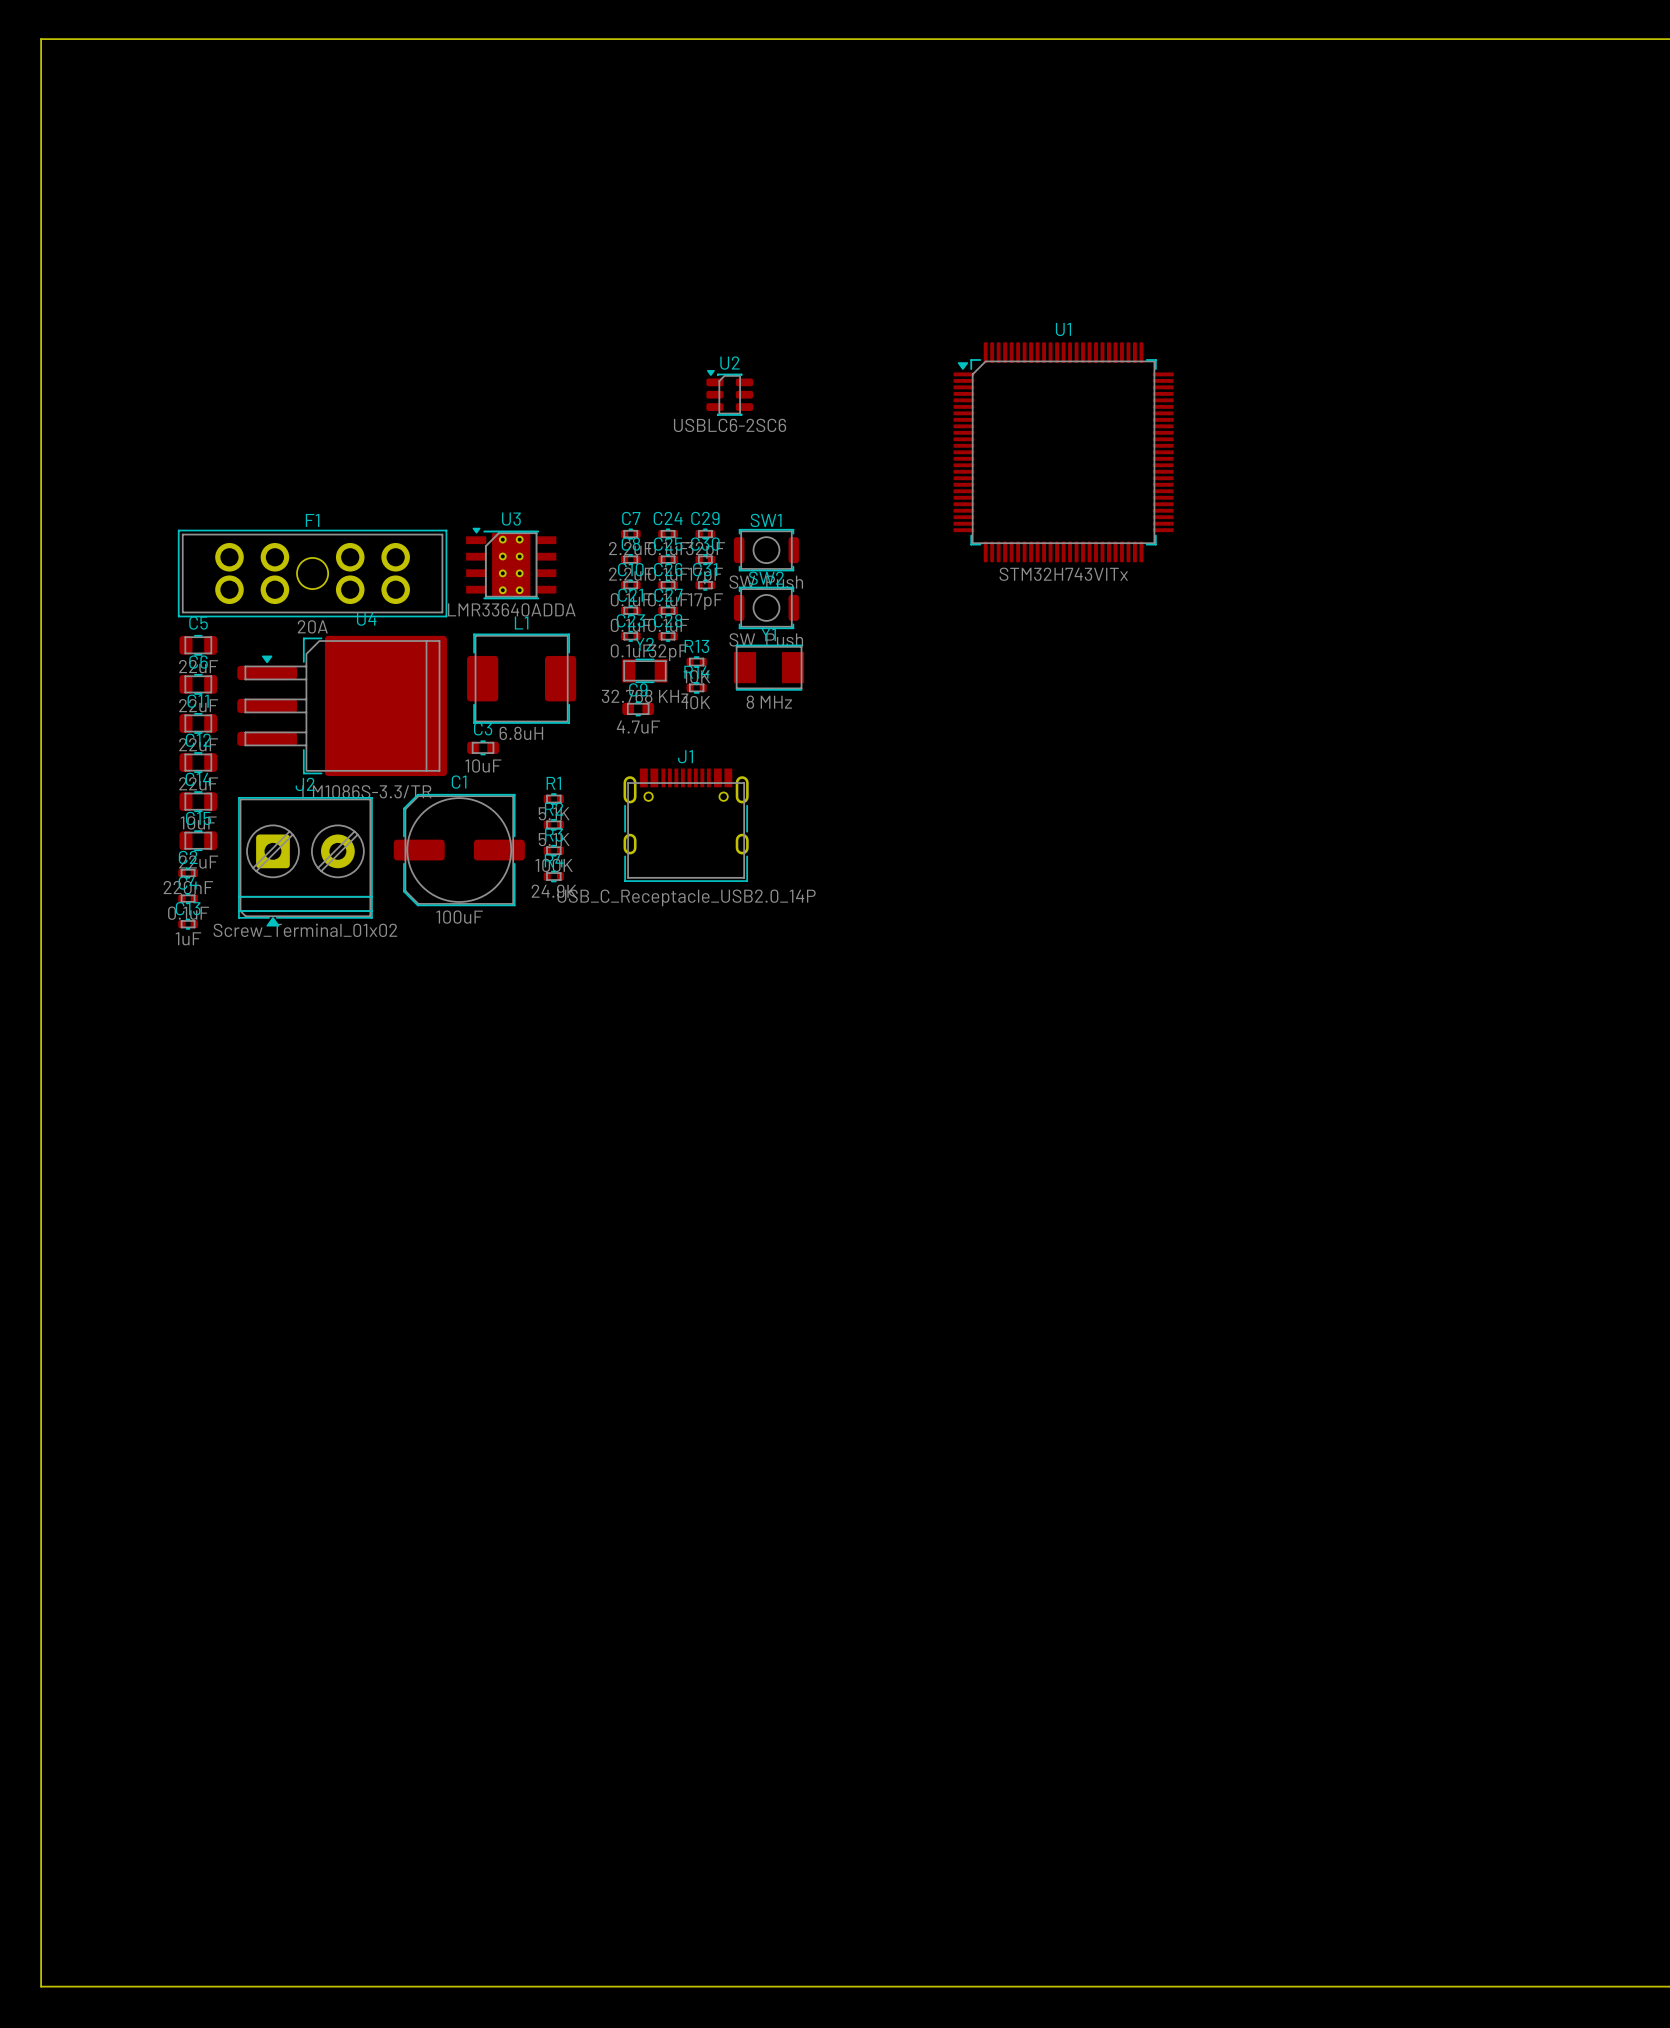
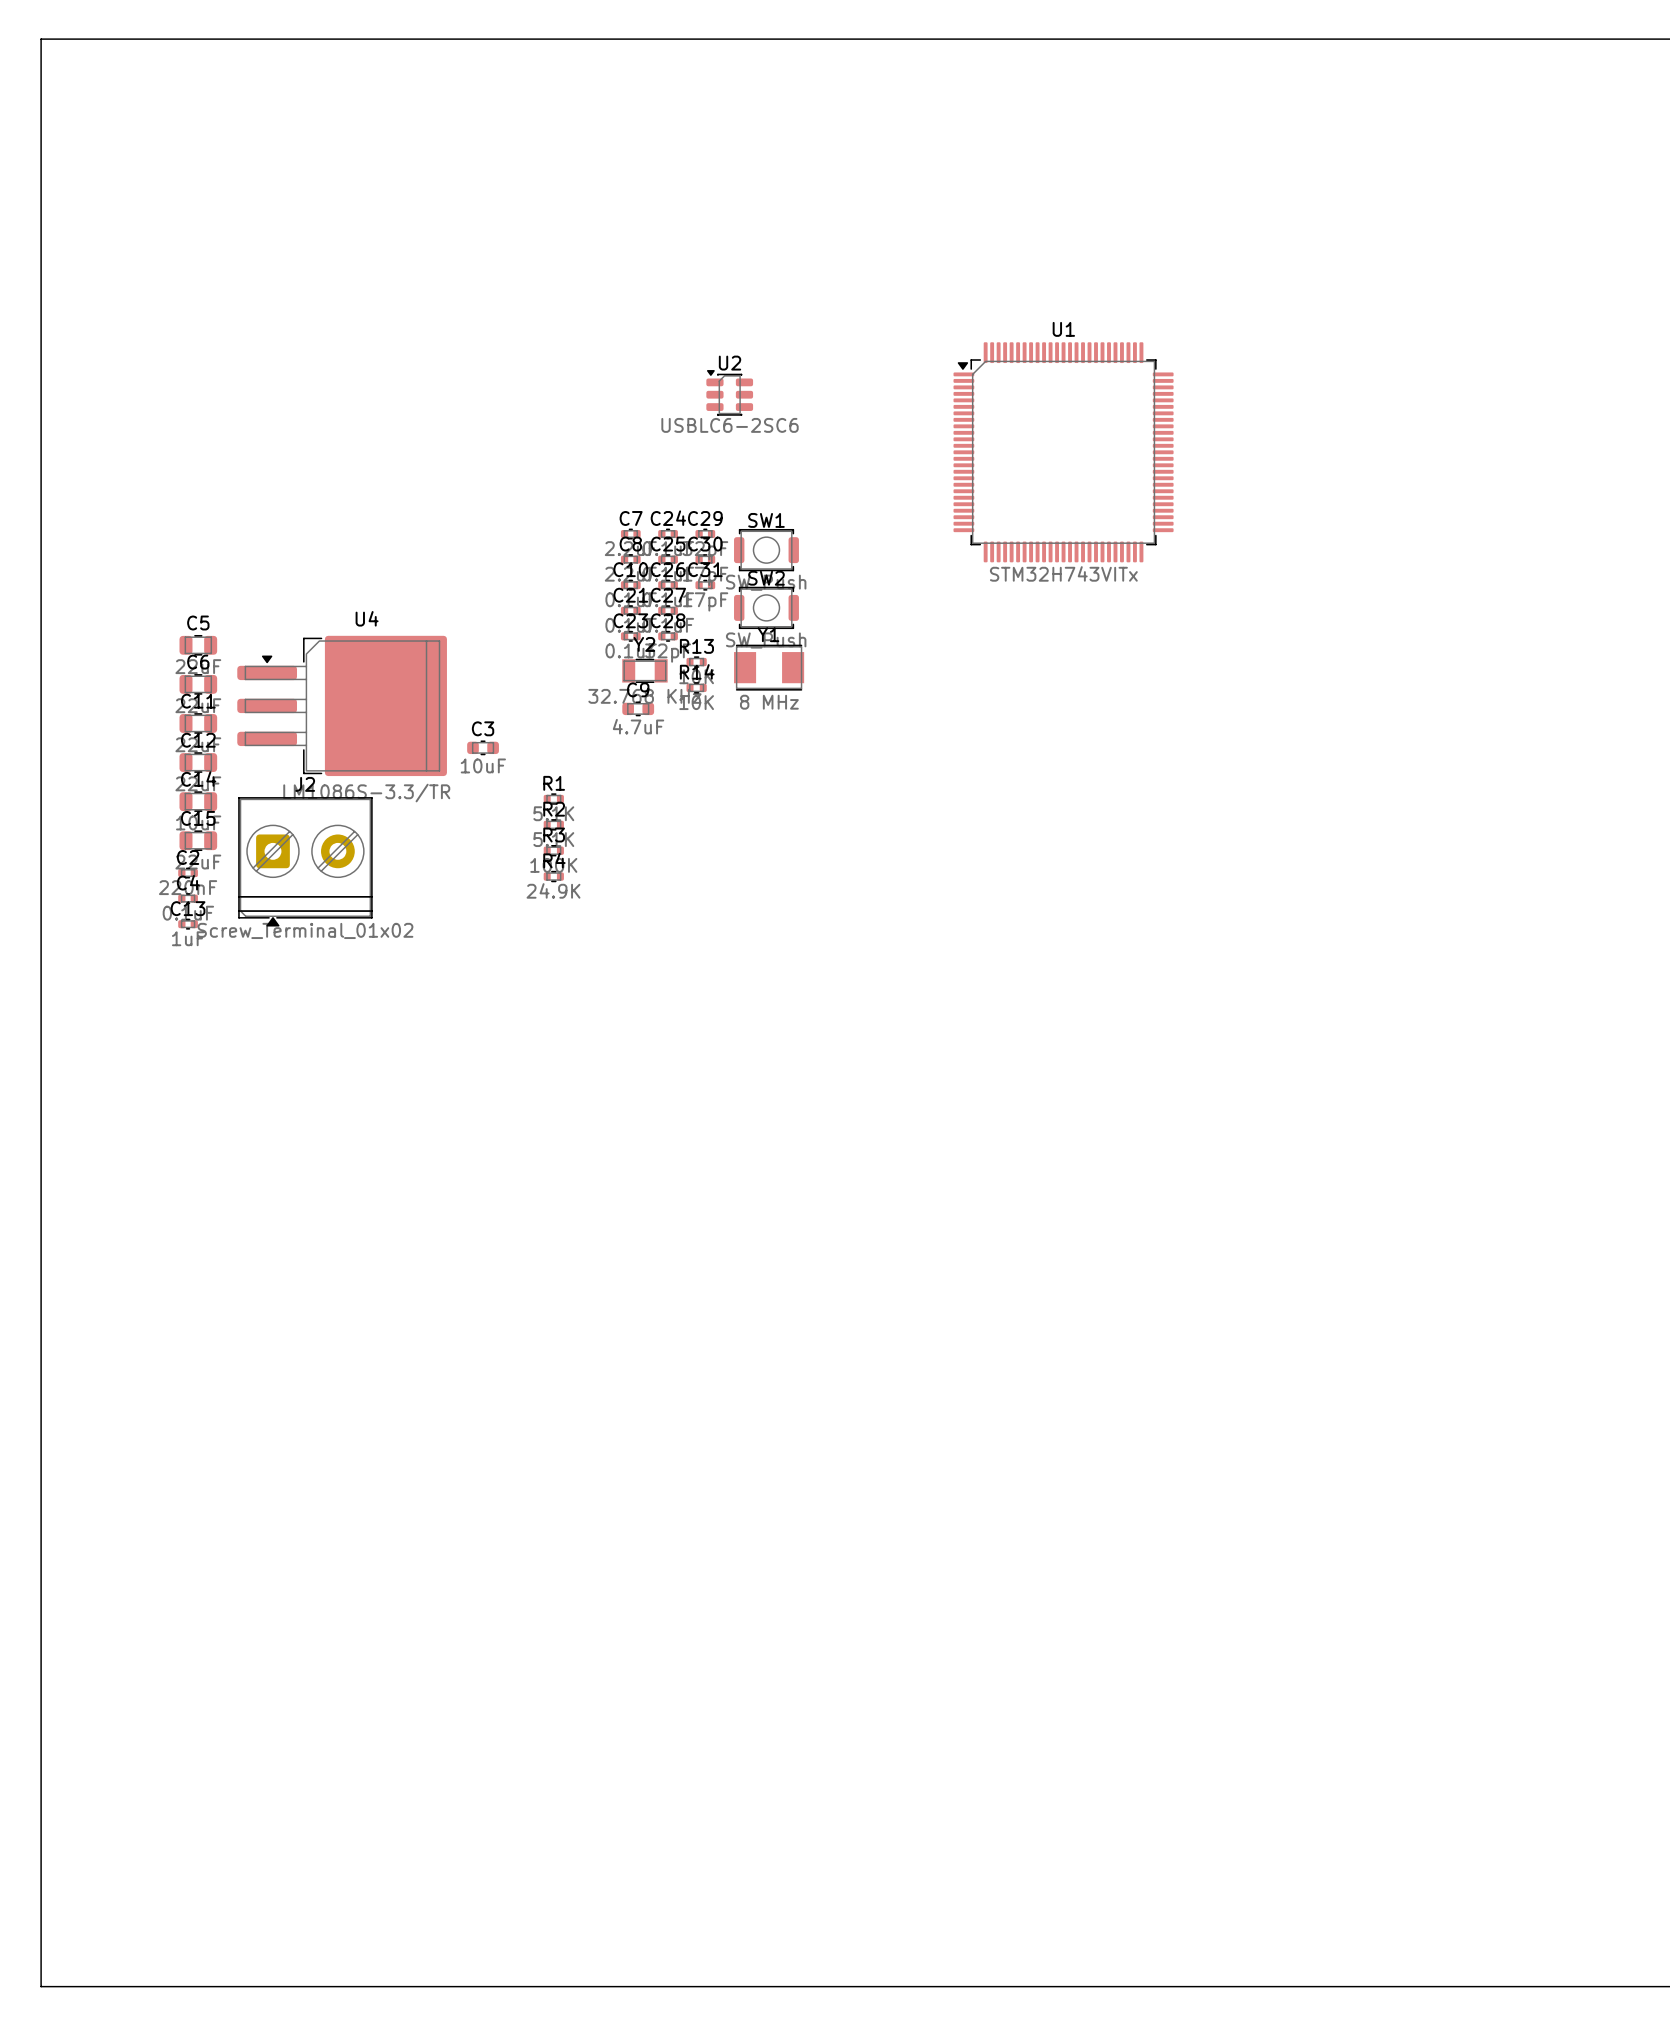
U3: LMR33640ADDA (511, 563) -> none
F1: 20A (312, 573) -> none
L1: 6.8uH (521, 678) -> none
J1: USB_C_Receptacle_USB2.0_14P (686, 825) -> none
C1: 100uF (459, 850) -> none

